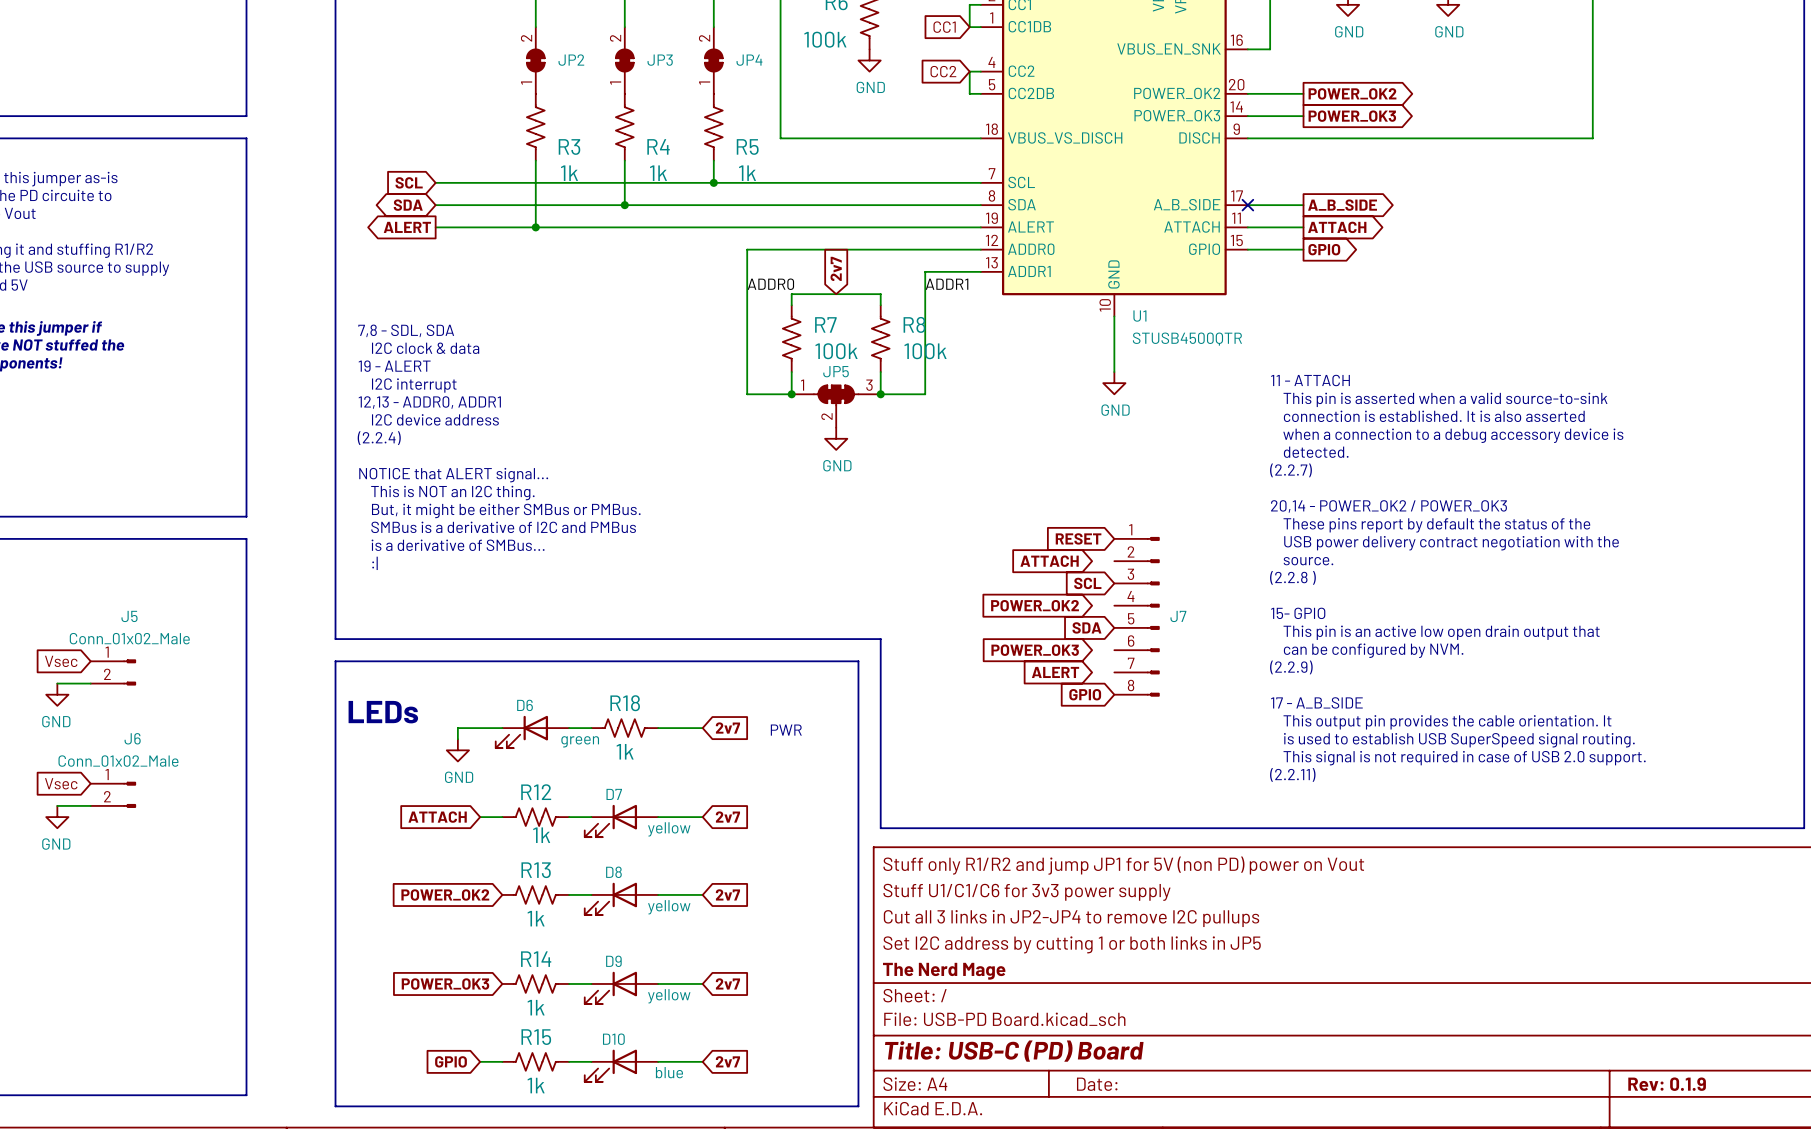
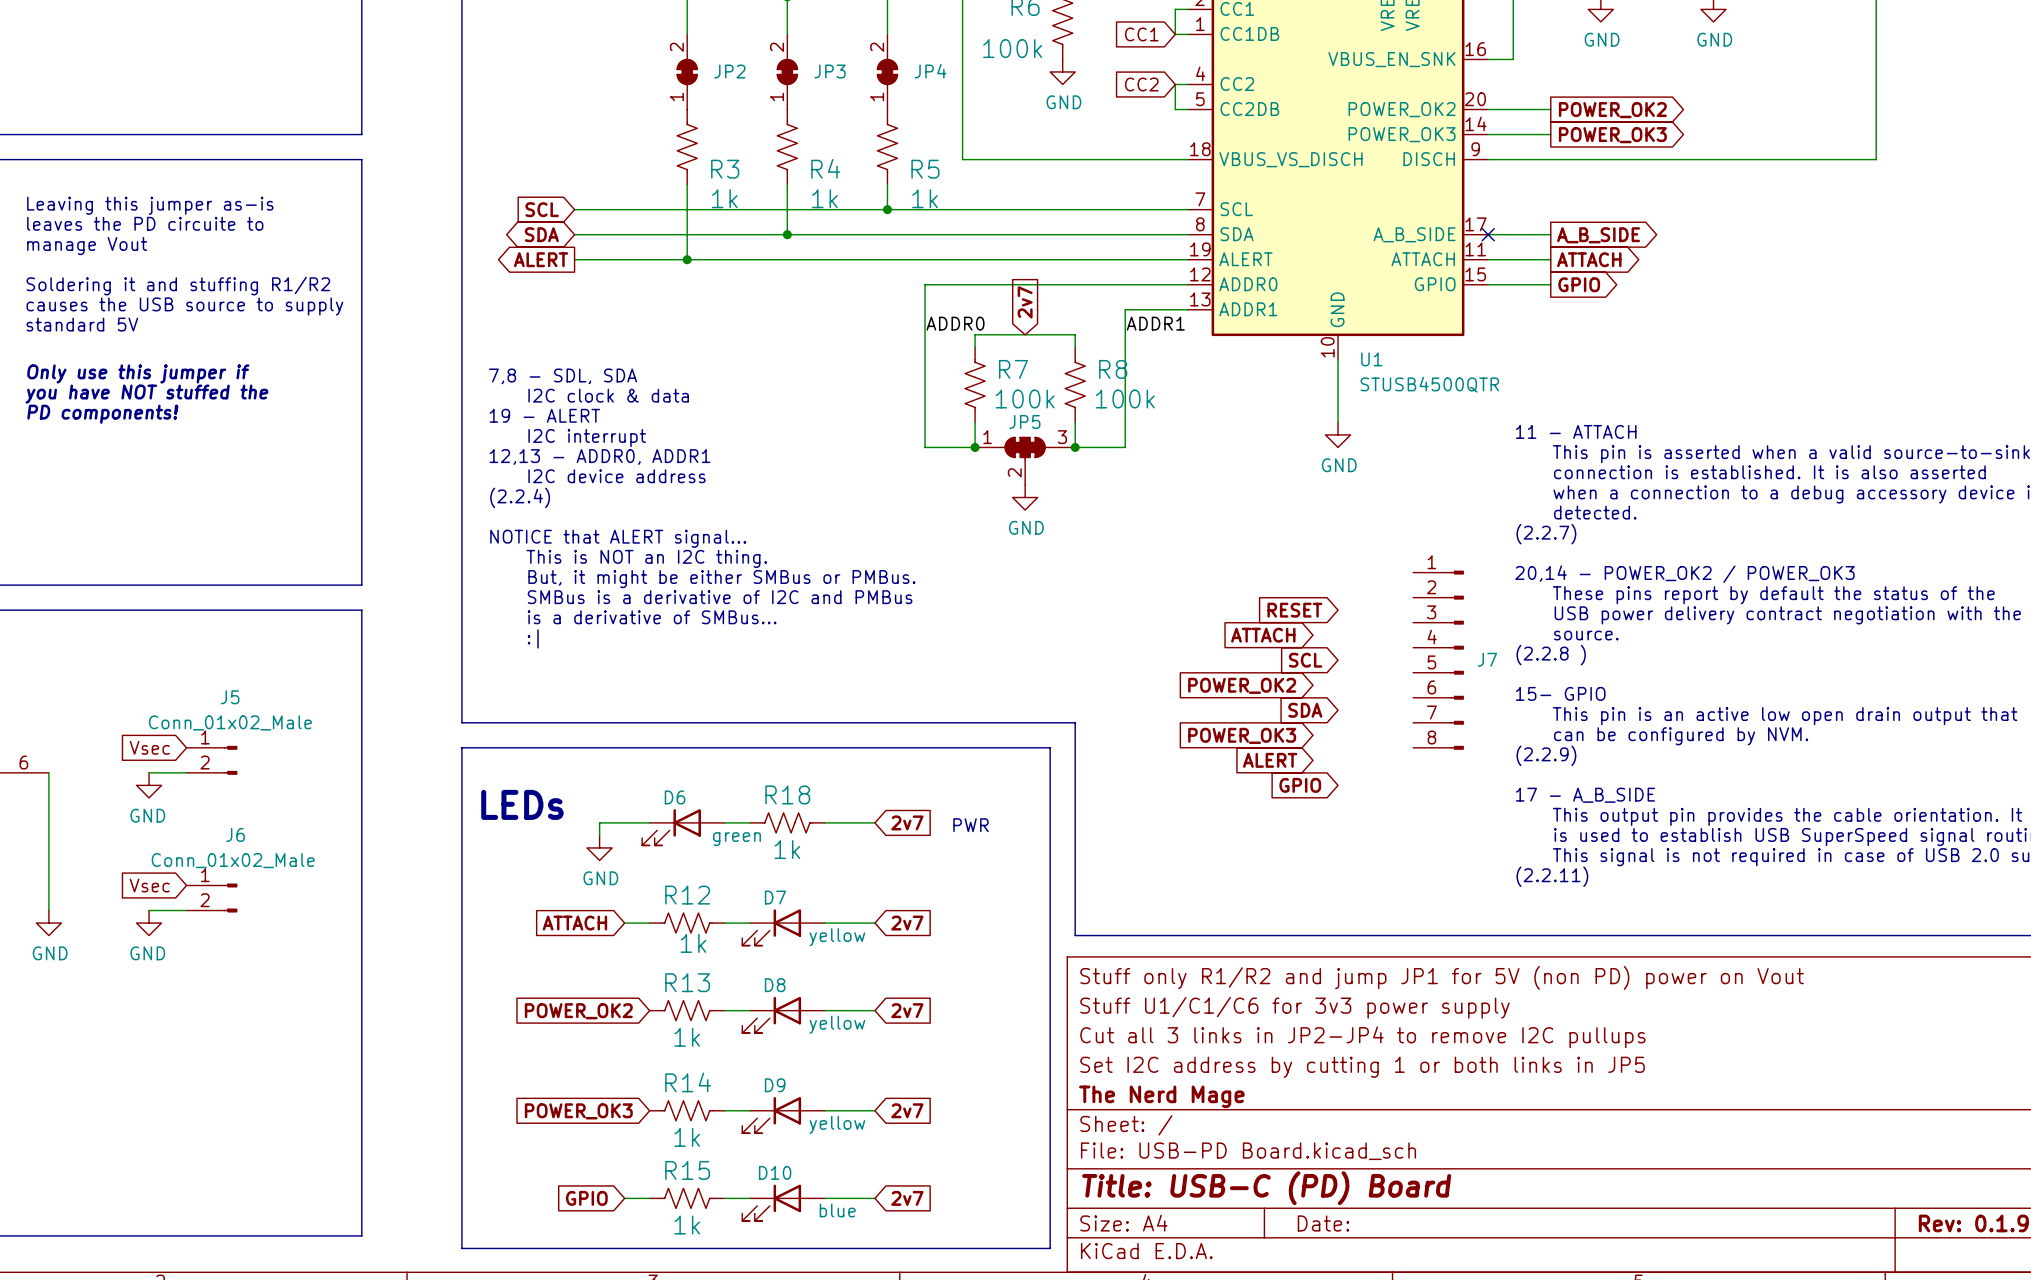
J7 position: (1136, 616) -> (1438, 660)

